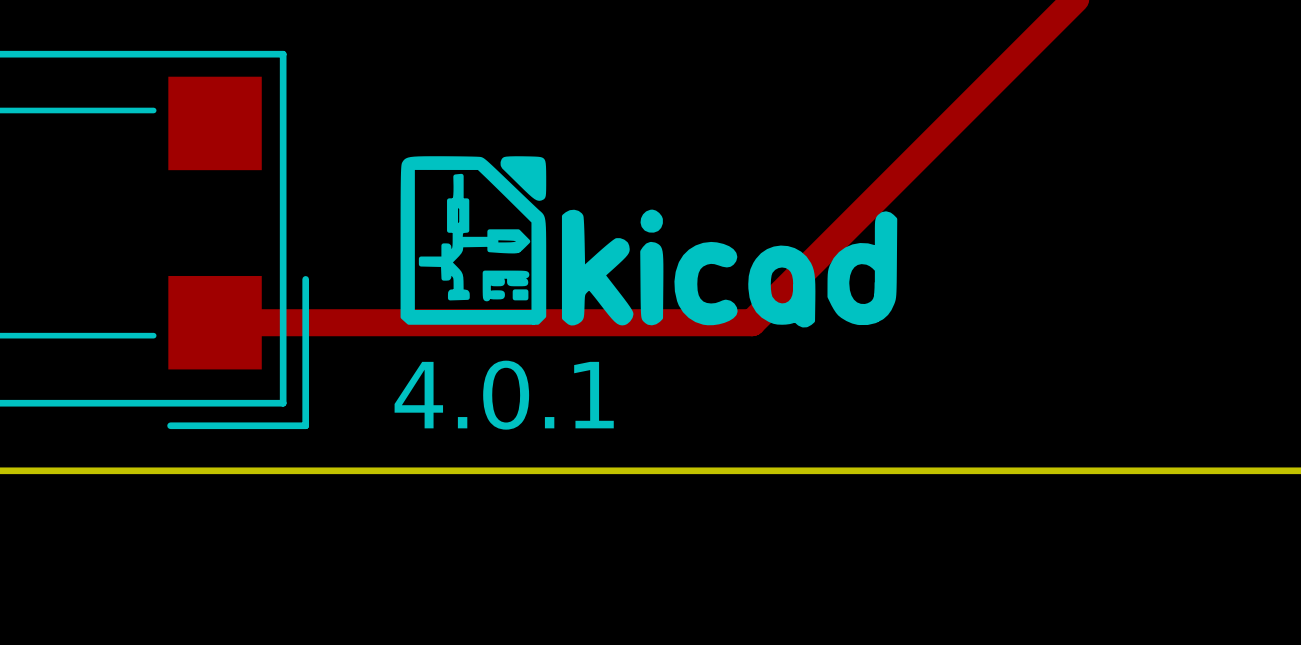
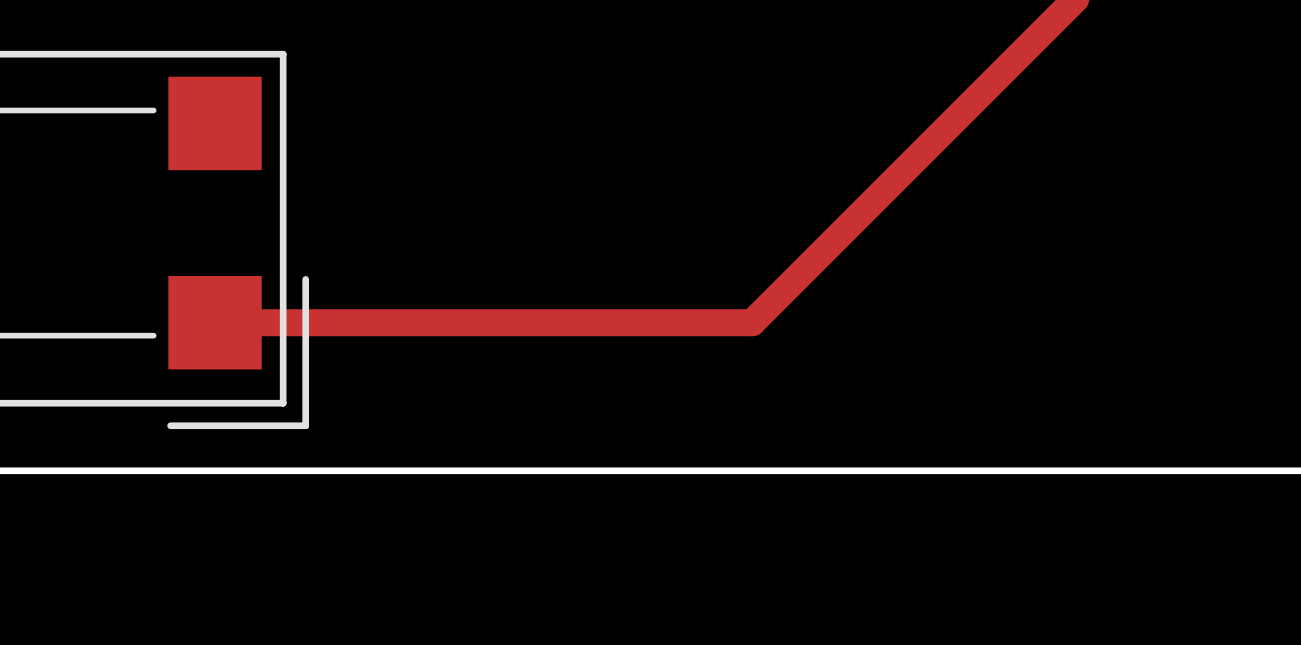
drawing: [400, 156, 898, 328] -> none
text: 4.0.1 (504, 395) -> none

